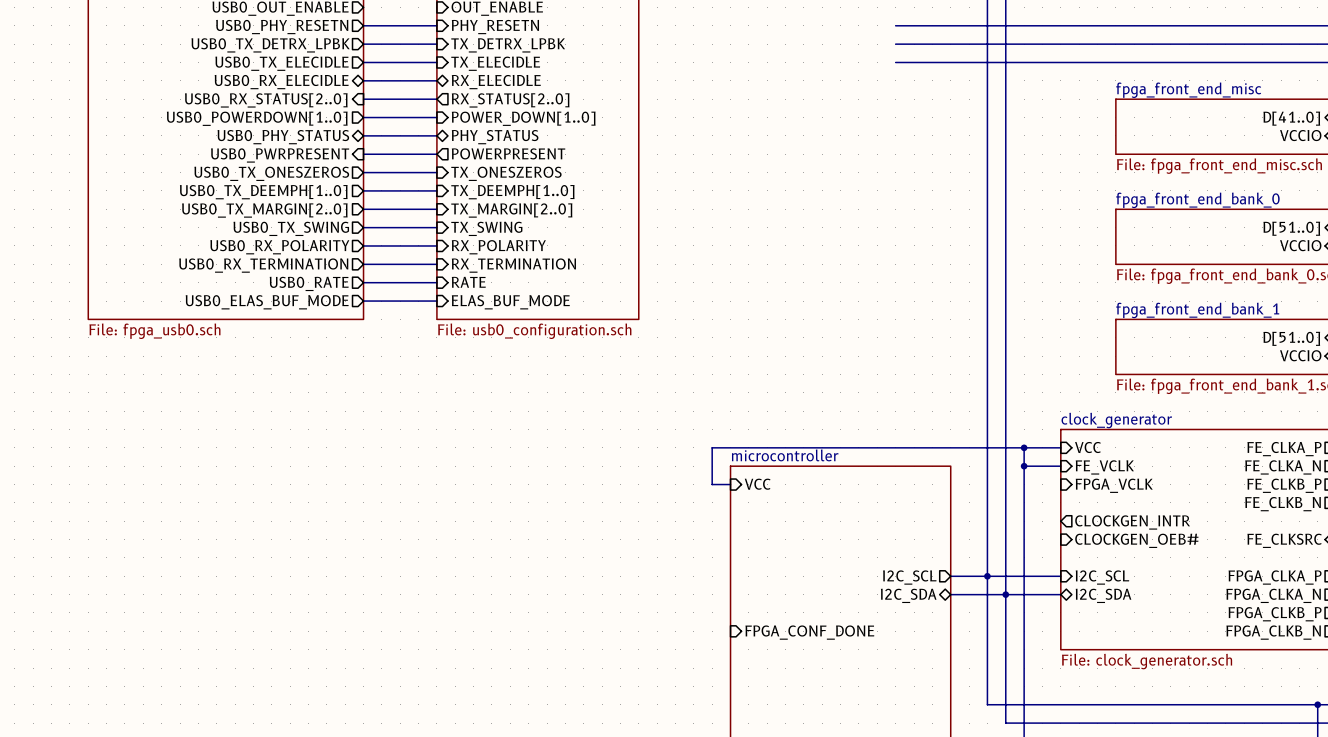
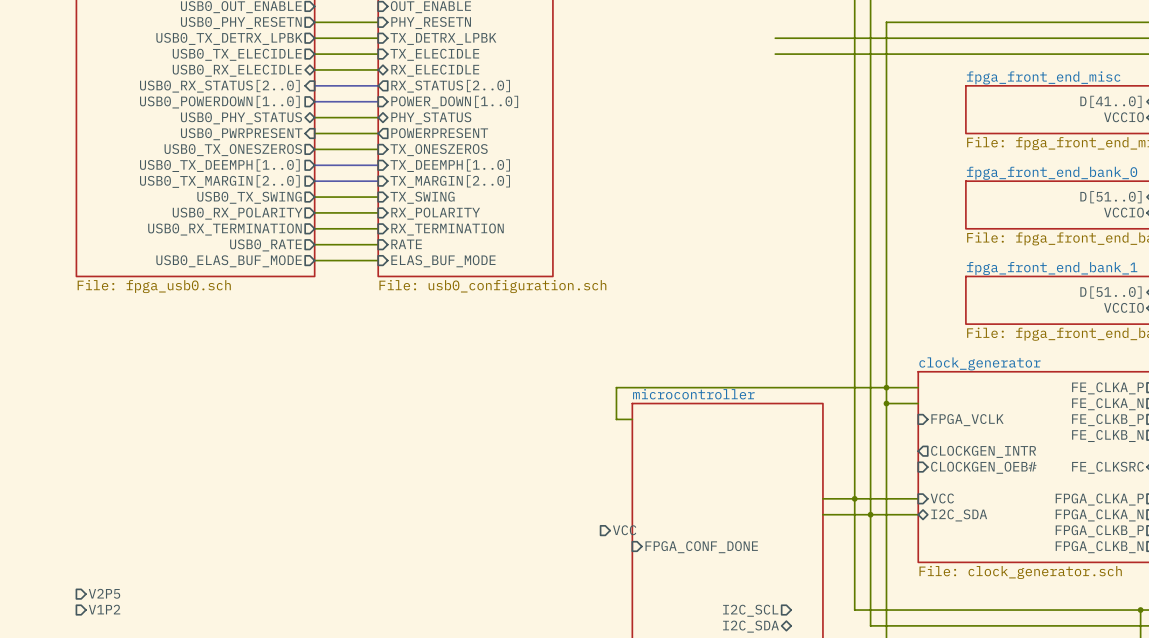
wire: (895, 25) (1024, 25) -> (886, 387) (886, 22)
sheet pin: VCC (1087, 447) -> none
sheet pin: FE_VCLK (1104, 467) -> none
sheet pin position: VCC (757, 484) -> VCC (624, 530)
sheet pin position: I2C_SCL (909, 577) -> I2C_SCL (750, 610)
sheet pin: I2C_SCL (1102, 577) -> VCC (942, 498)
sheet pin position: I2C_SDA (908, 595) -> I2C_SDA (750, 626)
sheet pin: none -> V2P5 (104, 593)
sheet pin: none -> V1P2 (104, 609)

